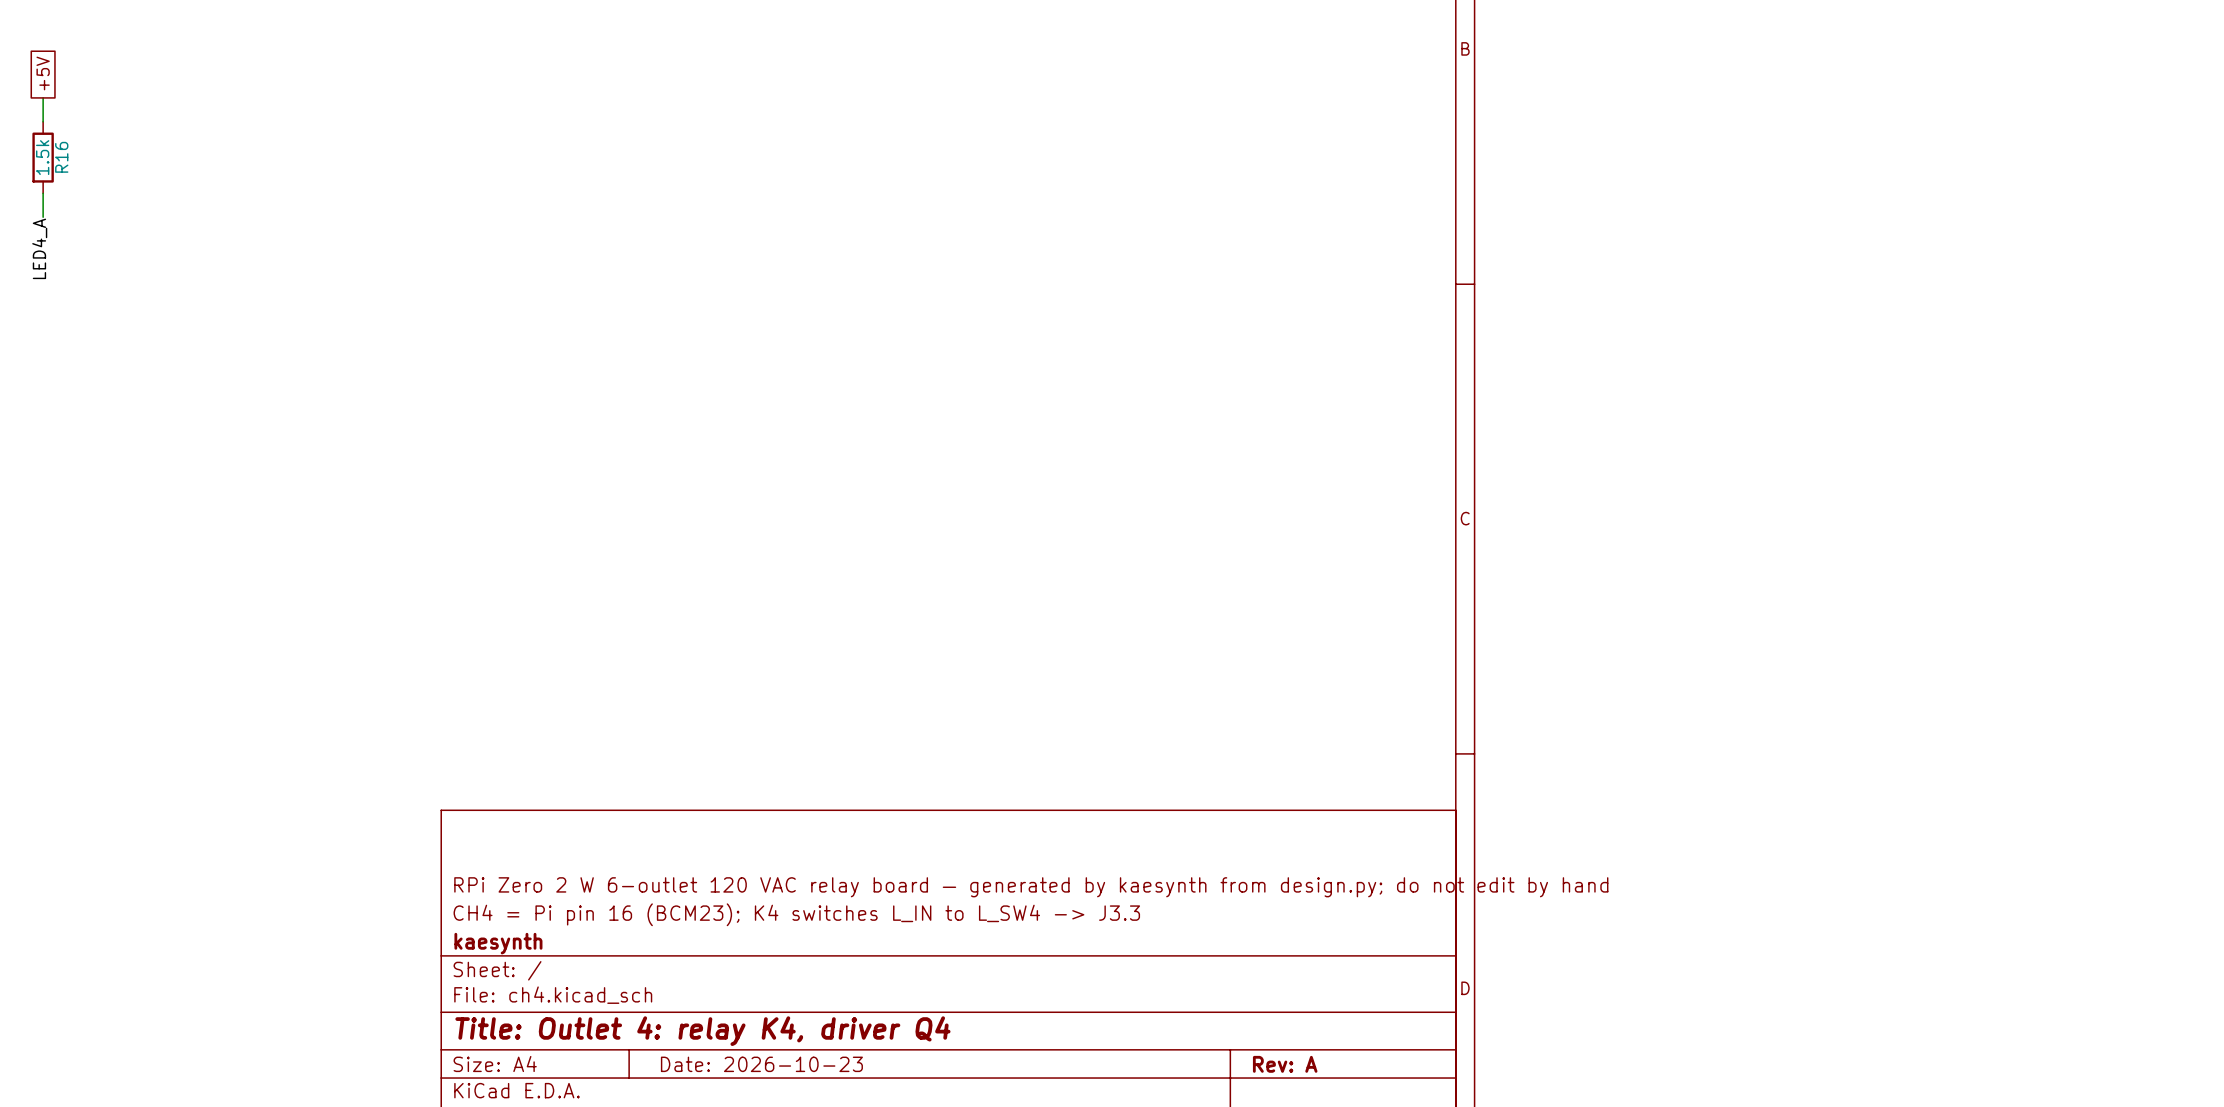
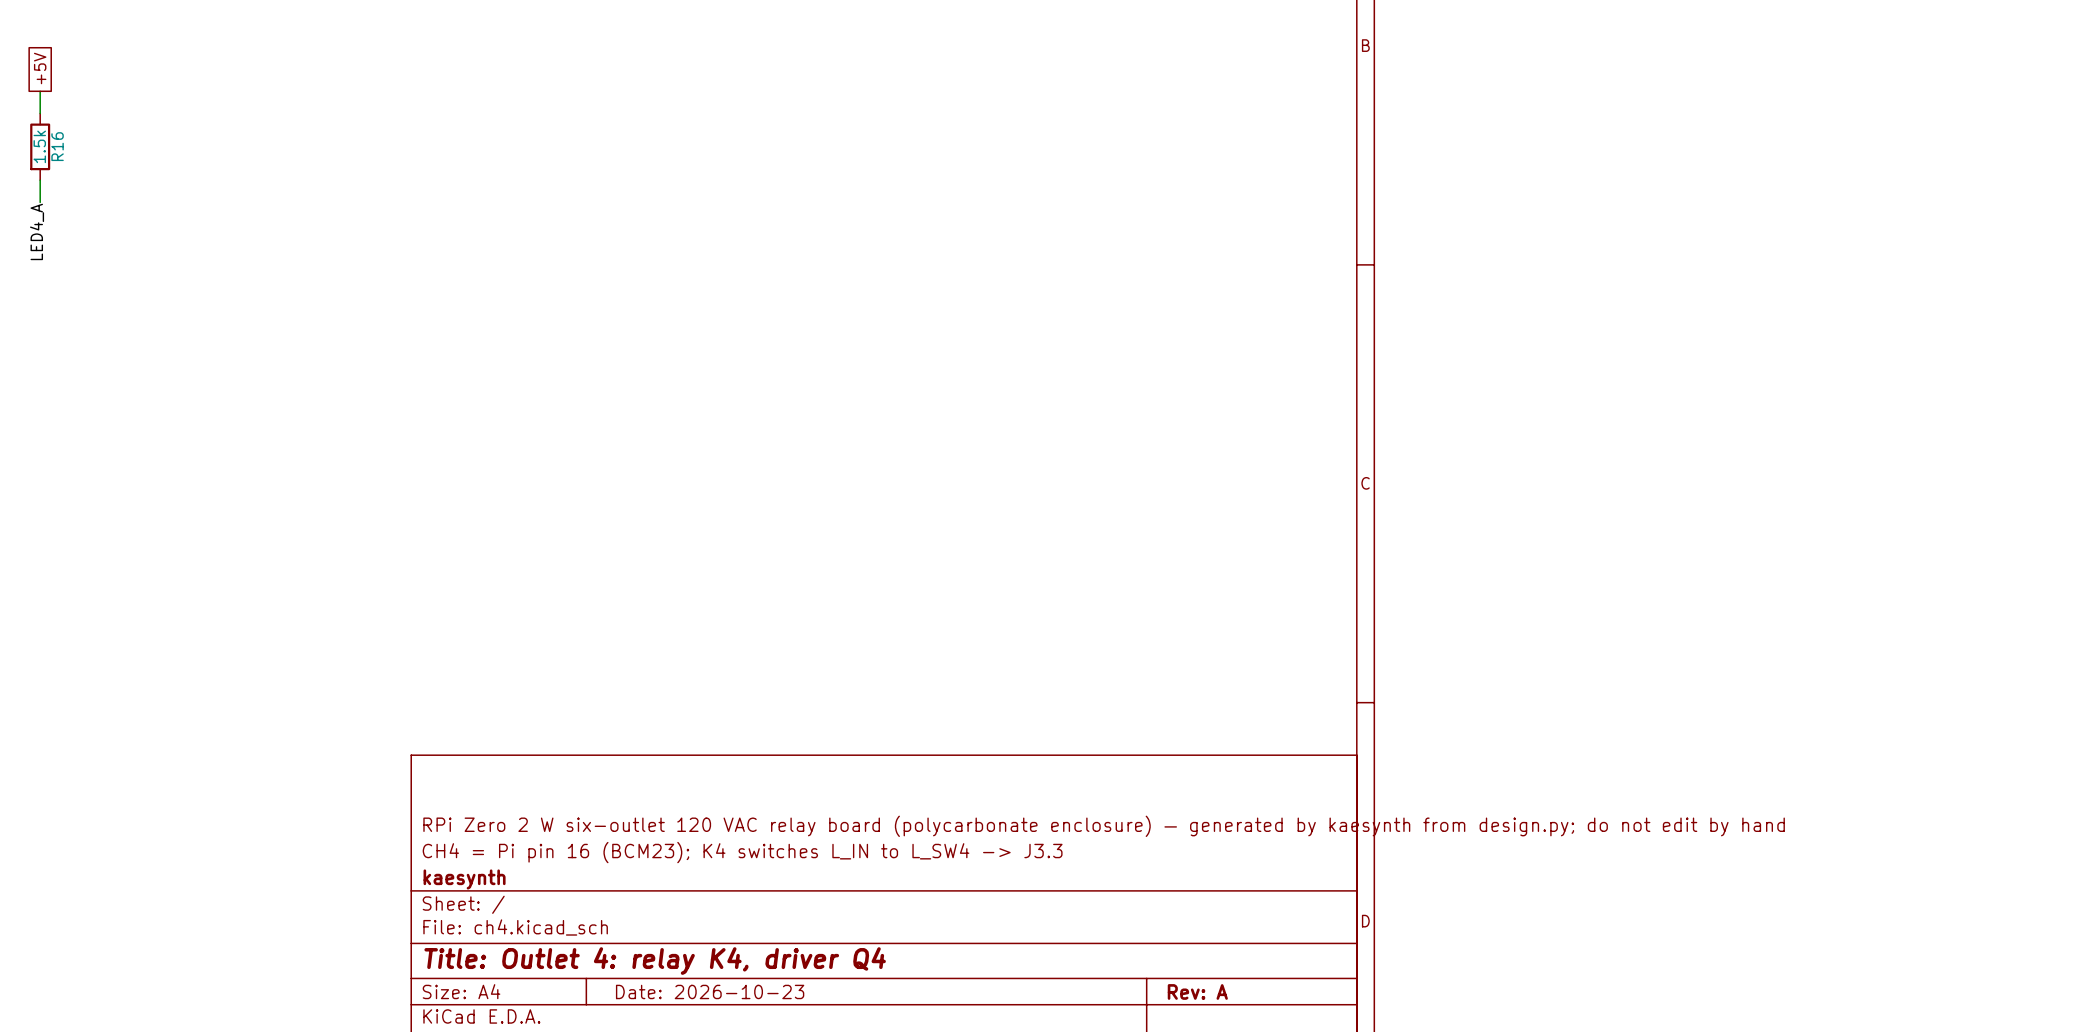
title block: RPi Zero 2 W 6-outlet 120 VAC relay board — generated by kaesynth from design.py; do not edit by hand (1031, 887) -> RPi Zero 2 W six-outlet 120 VAC relay board (polycarbonate enclosure) — generated by kaesynth from design.py; do not edit by hand (1104, 826)

